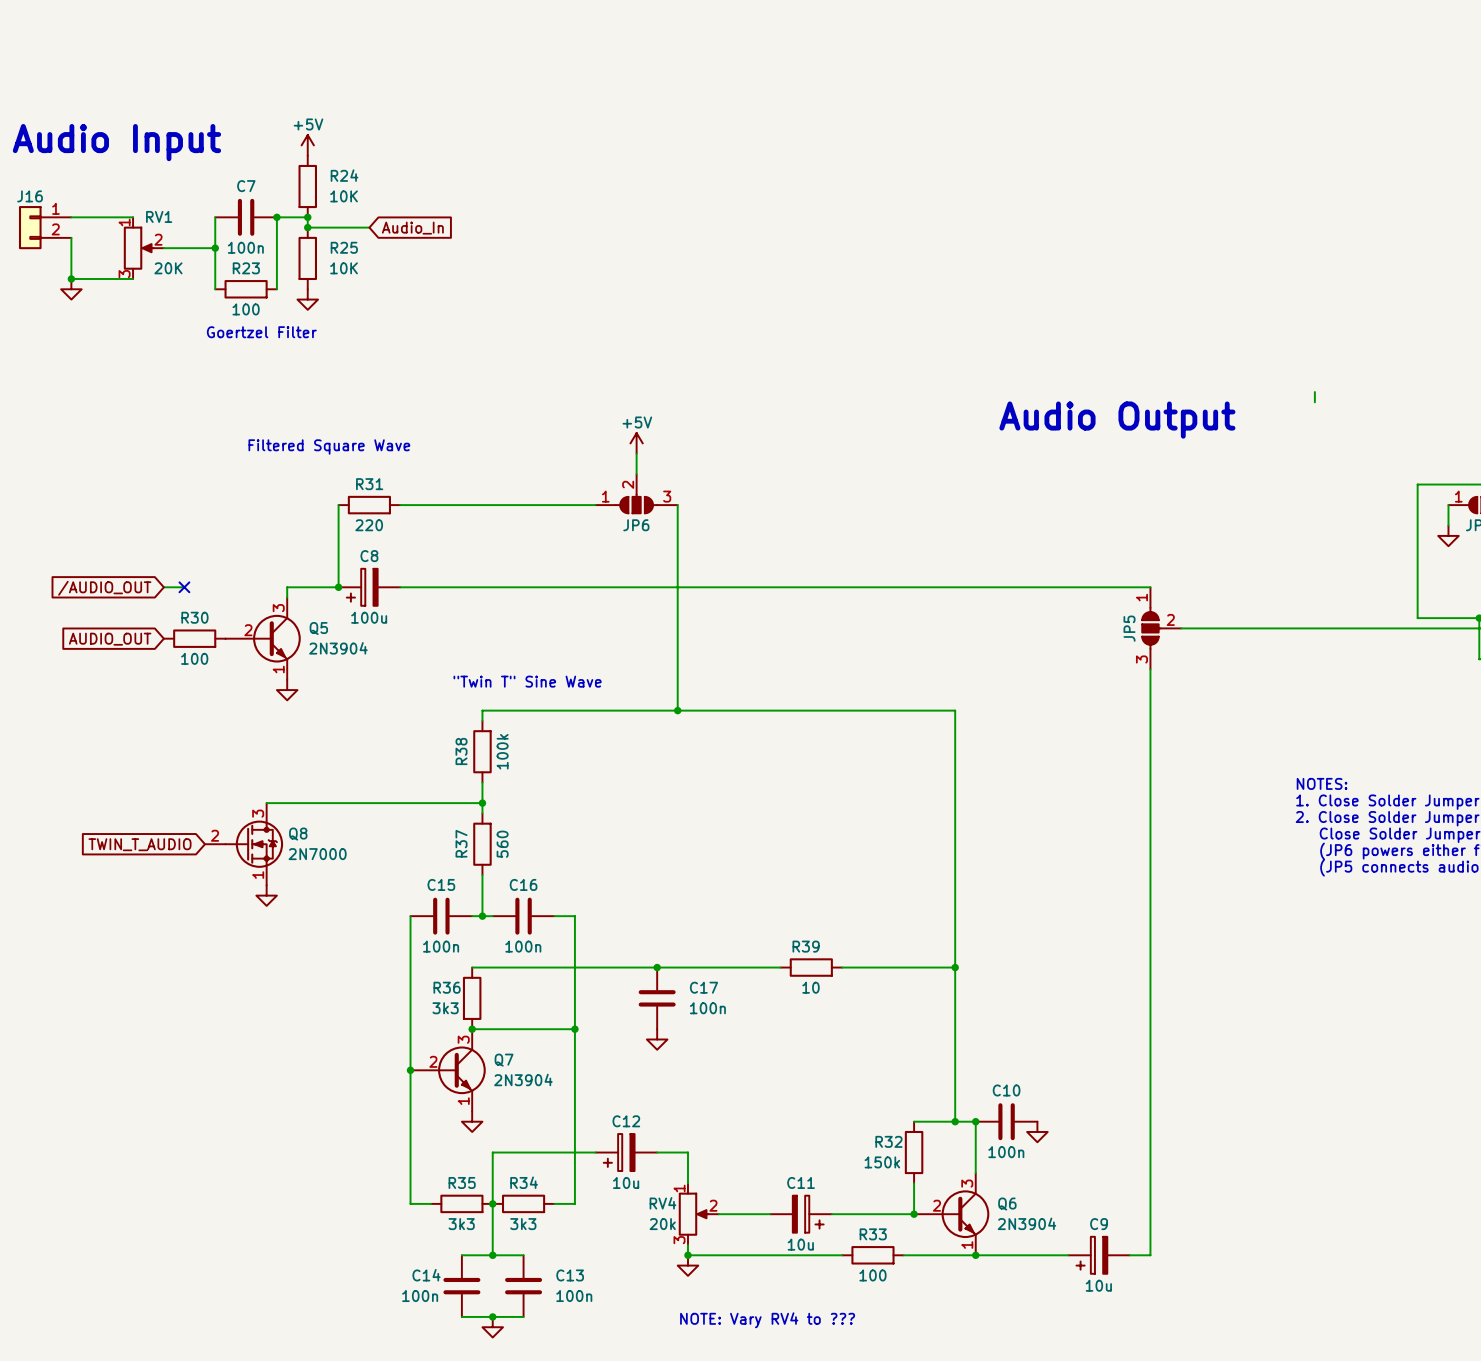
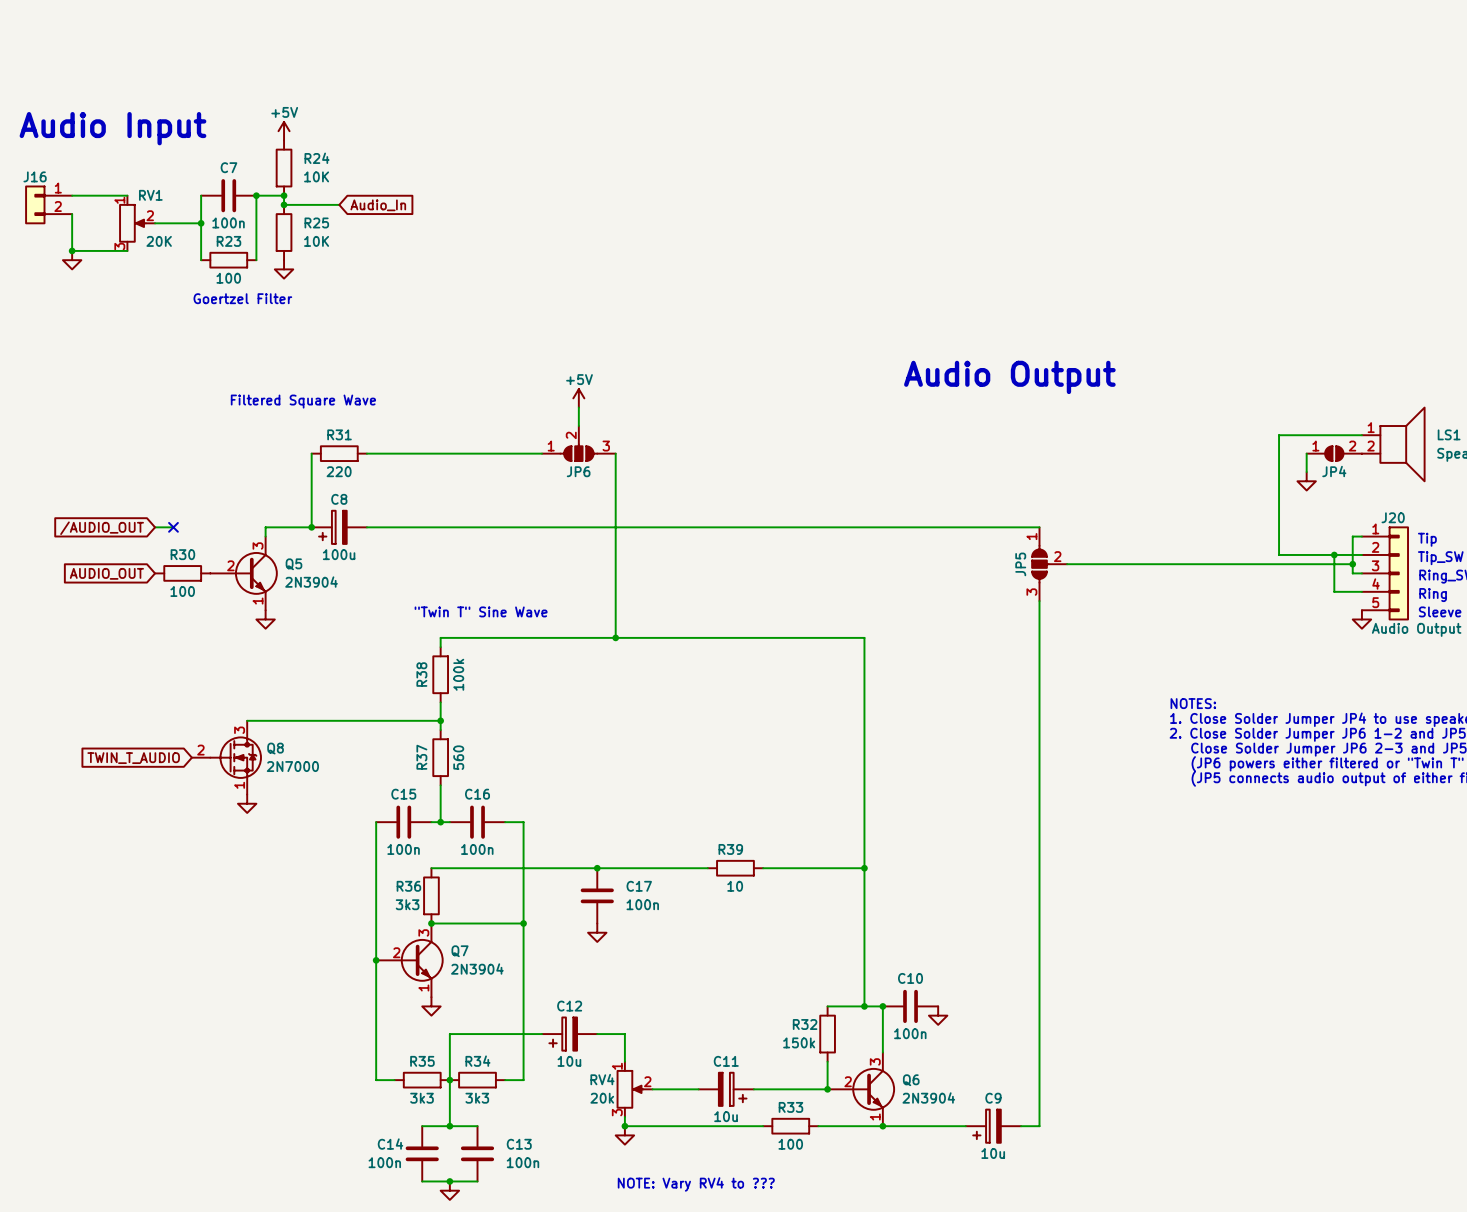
wire: (1314, 392) (1314, 402) -> none

